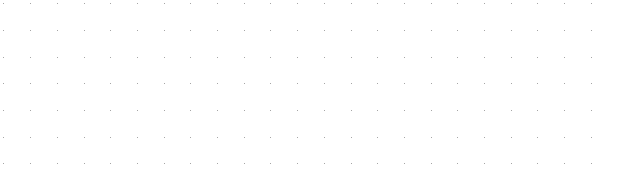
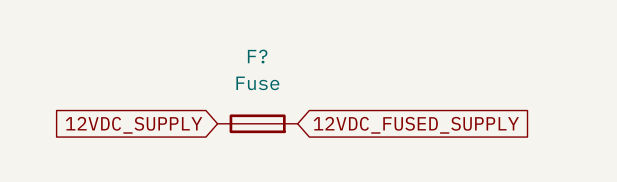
F?: none -> Fuse (257, 123)
global label: none -> 12VDC_SUPPLY (134, 125)
global label: none -> 12VDC_FUSED_SUPPLY (416, 125)

